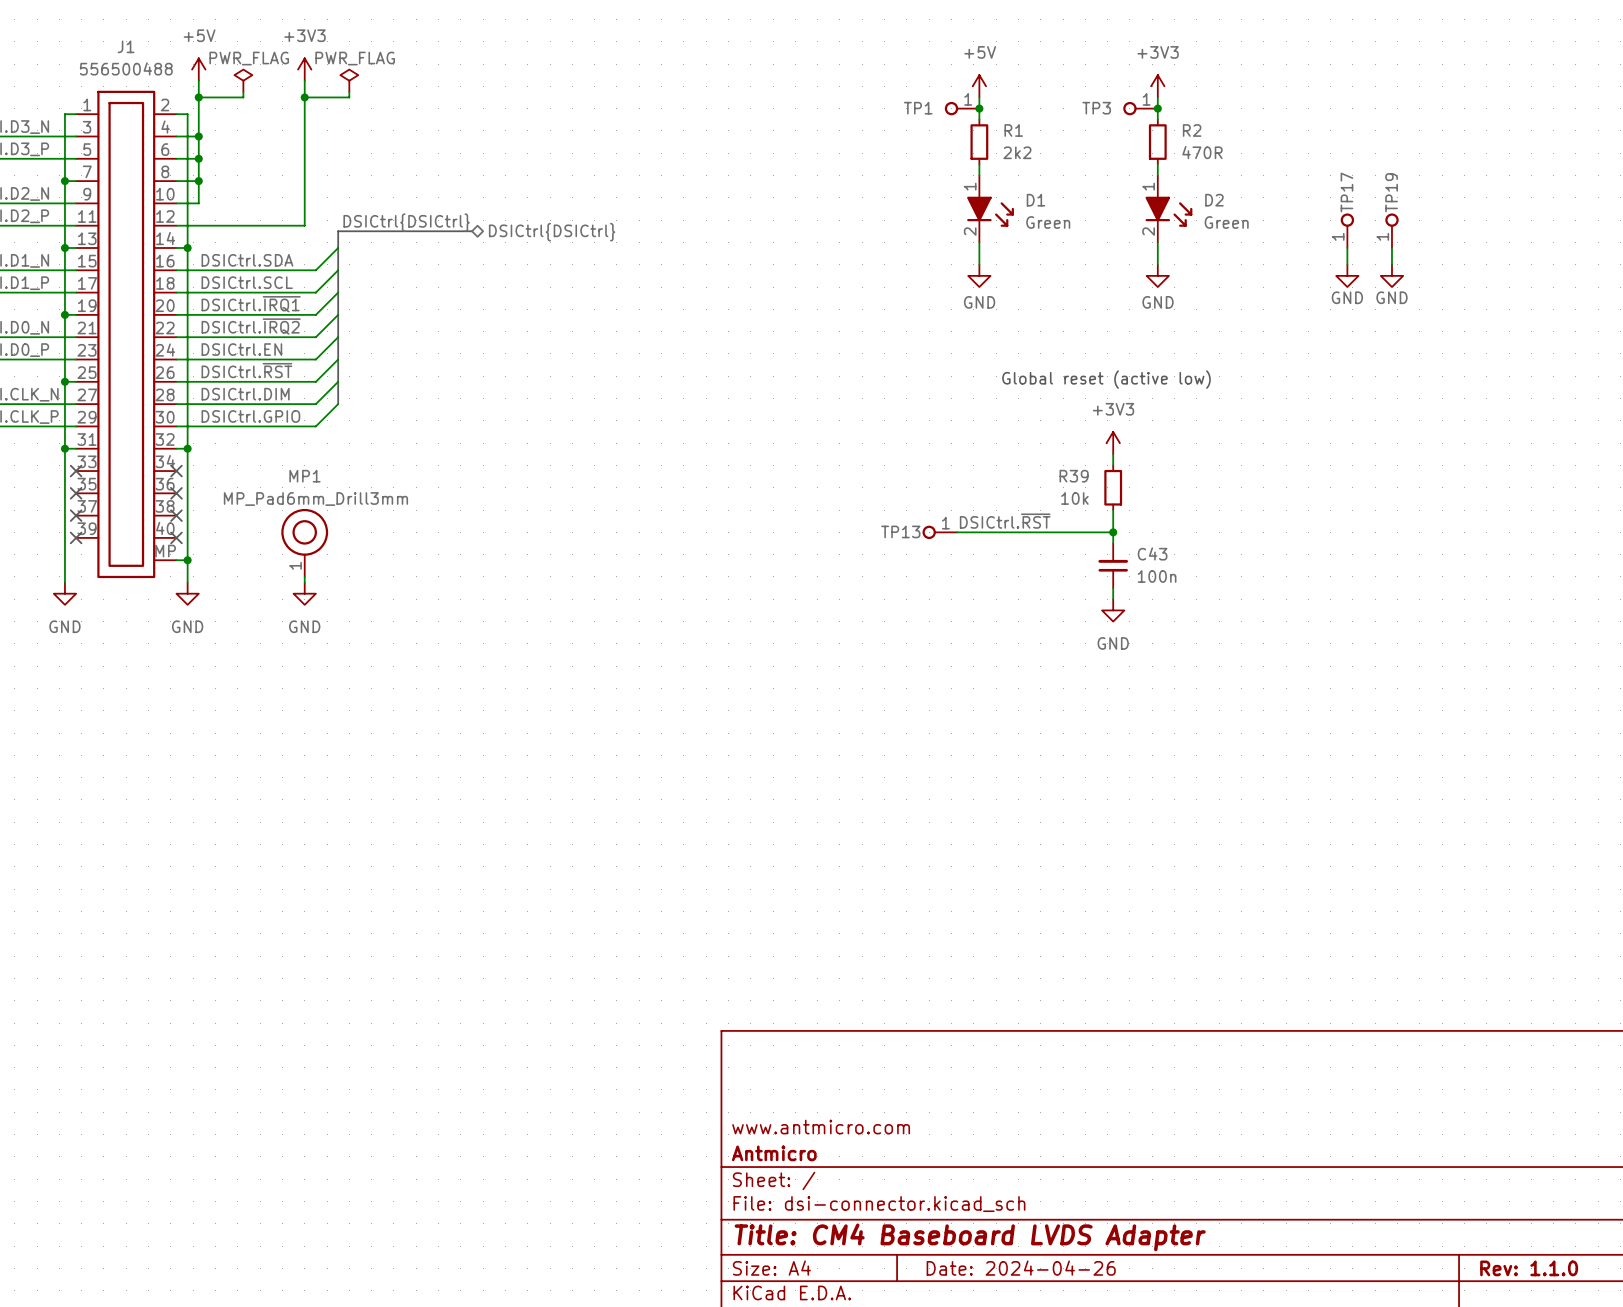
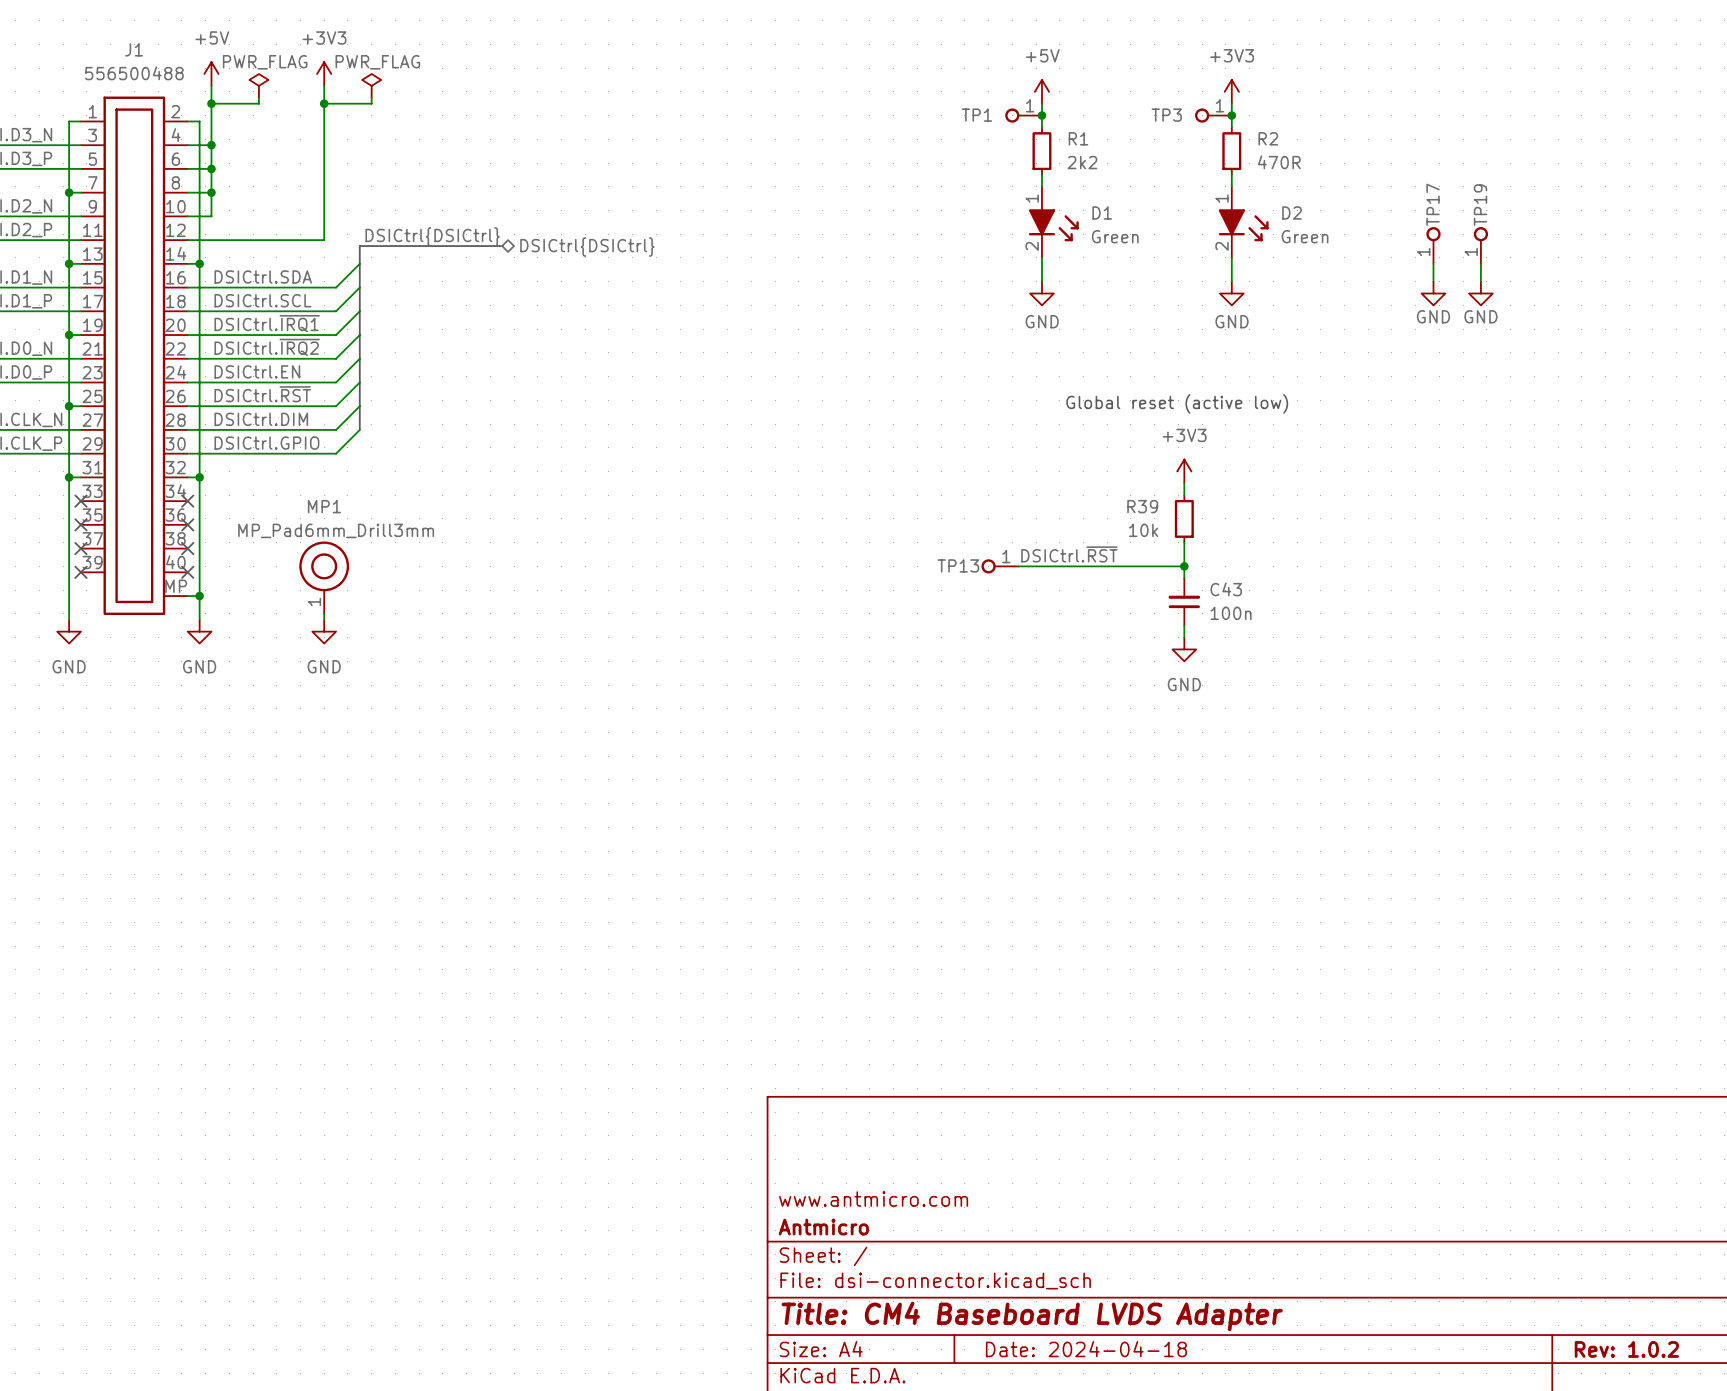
title block: Date: 2024-04-26 (1021, 1268) -> Date: 2024-04-18 (1086, 1349)
title block: Rev: 1.1.0 (1529, 1268) -> Rev: 1.0.2 (1626, 1349)

